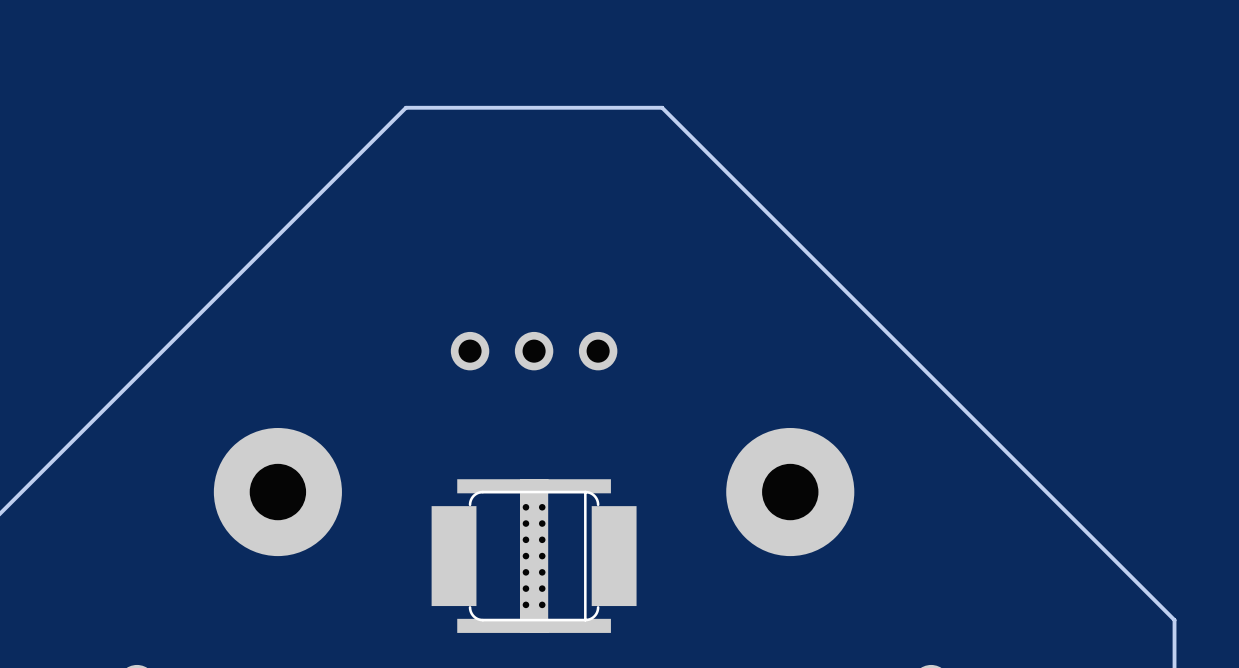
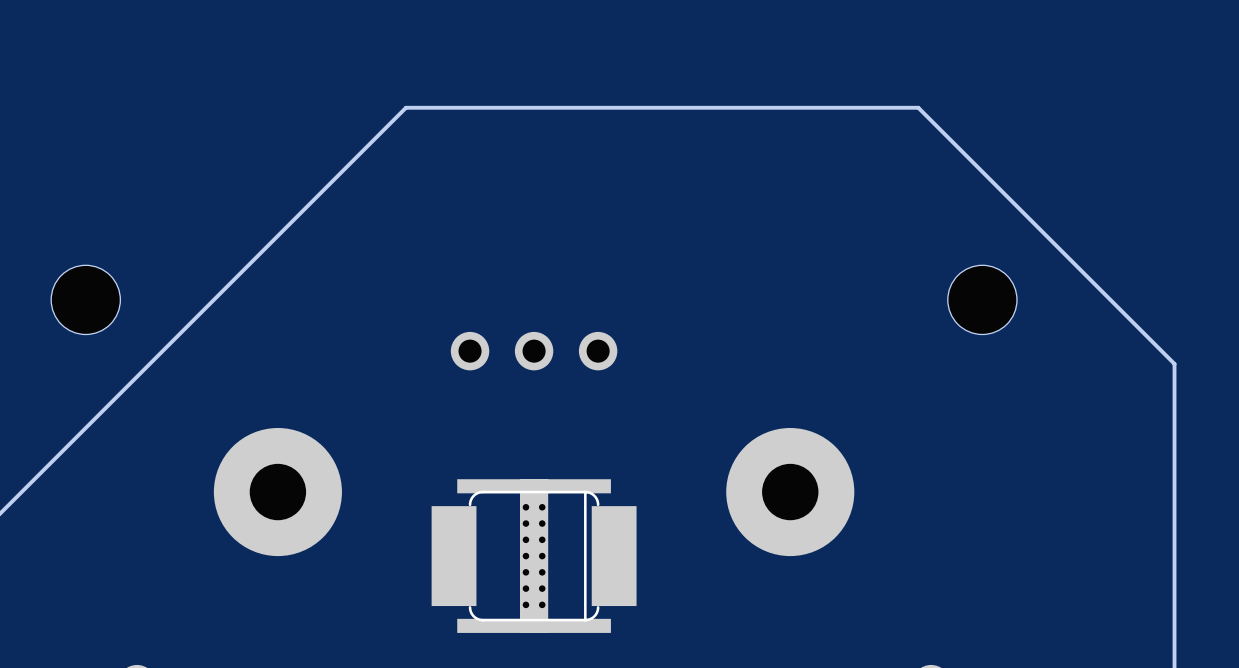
board edge: (662, 107) (1174, 620) -> (662, 107) (918, 107) (1174, 363) (1174, 620)
part: none -> (85, 299)
part: none -> (982, 299)

